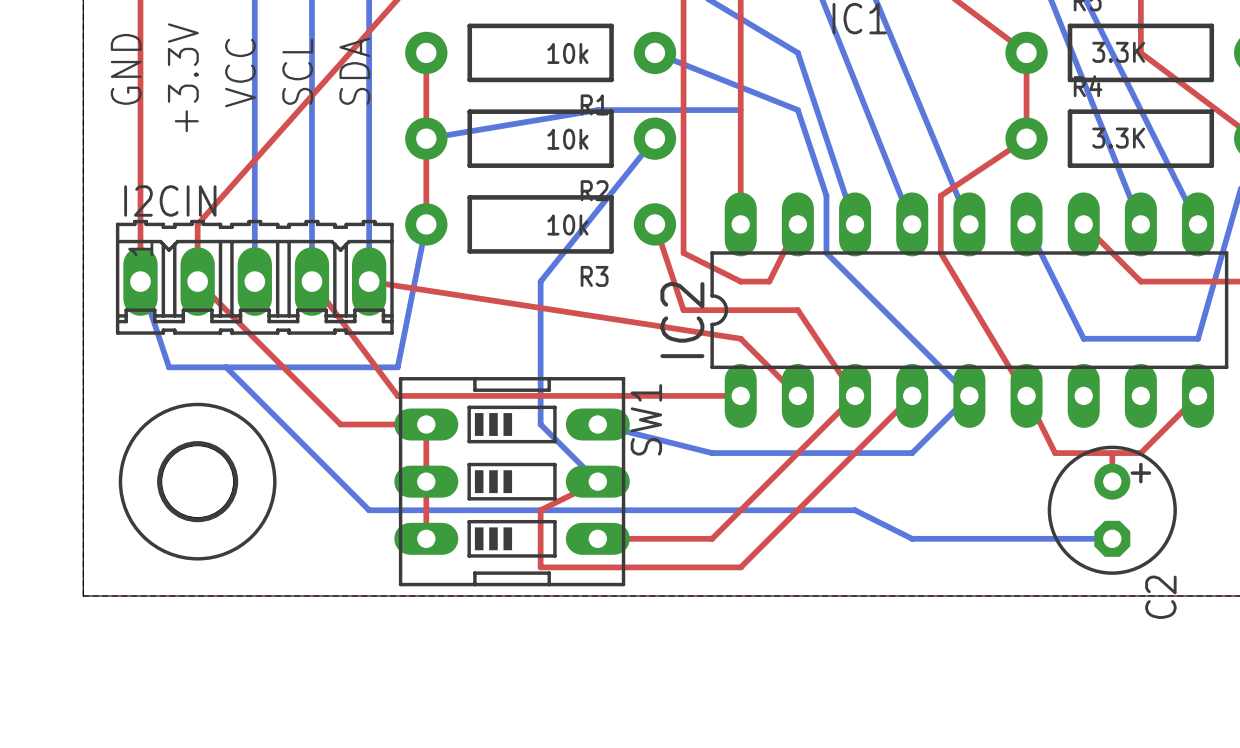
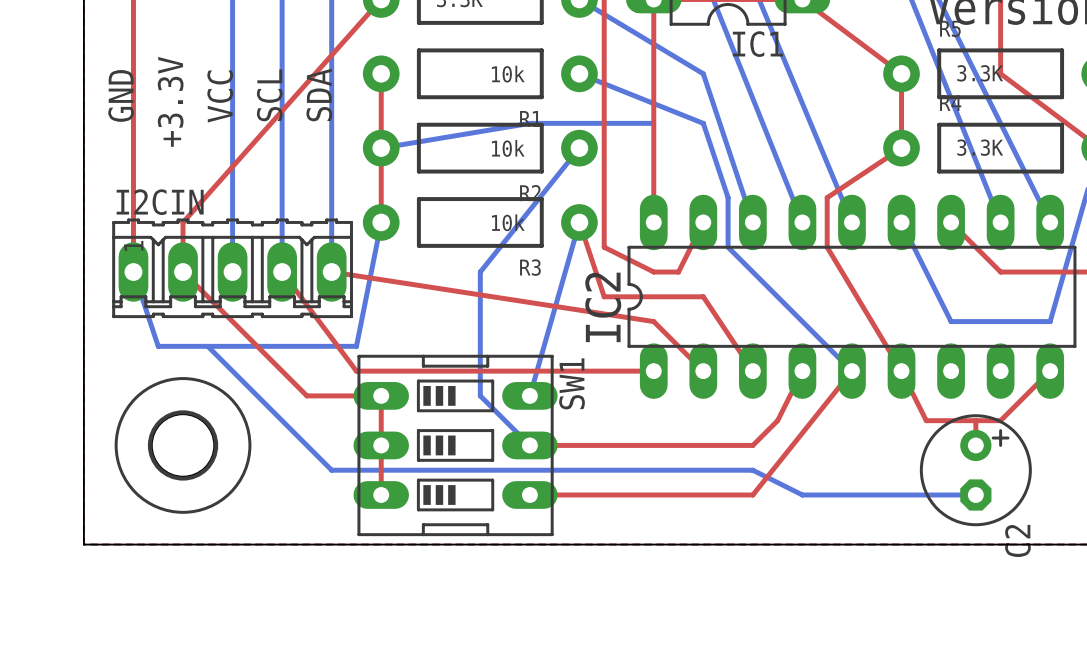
top track: (855, 395) (712, 538) -> (851, 371) (752, 495) (628, 495)
top track: (912, 395) (740, 567) (540, 567) (540, 510) (597, 481) -> (802, 371) (777, 420) (752, 445) (529, 445)
bottom track: (969, 395) (912, 453) (712, 453) (597, 424) -> (579, 222) (529, 395)

